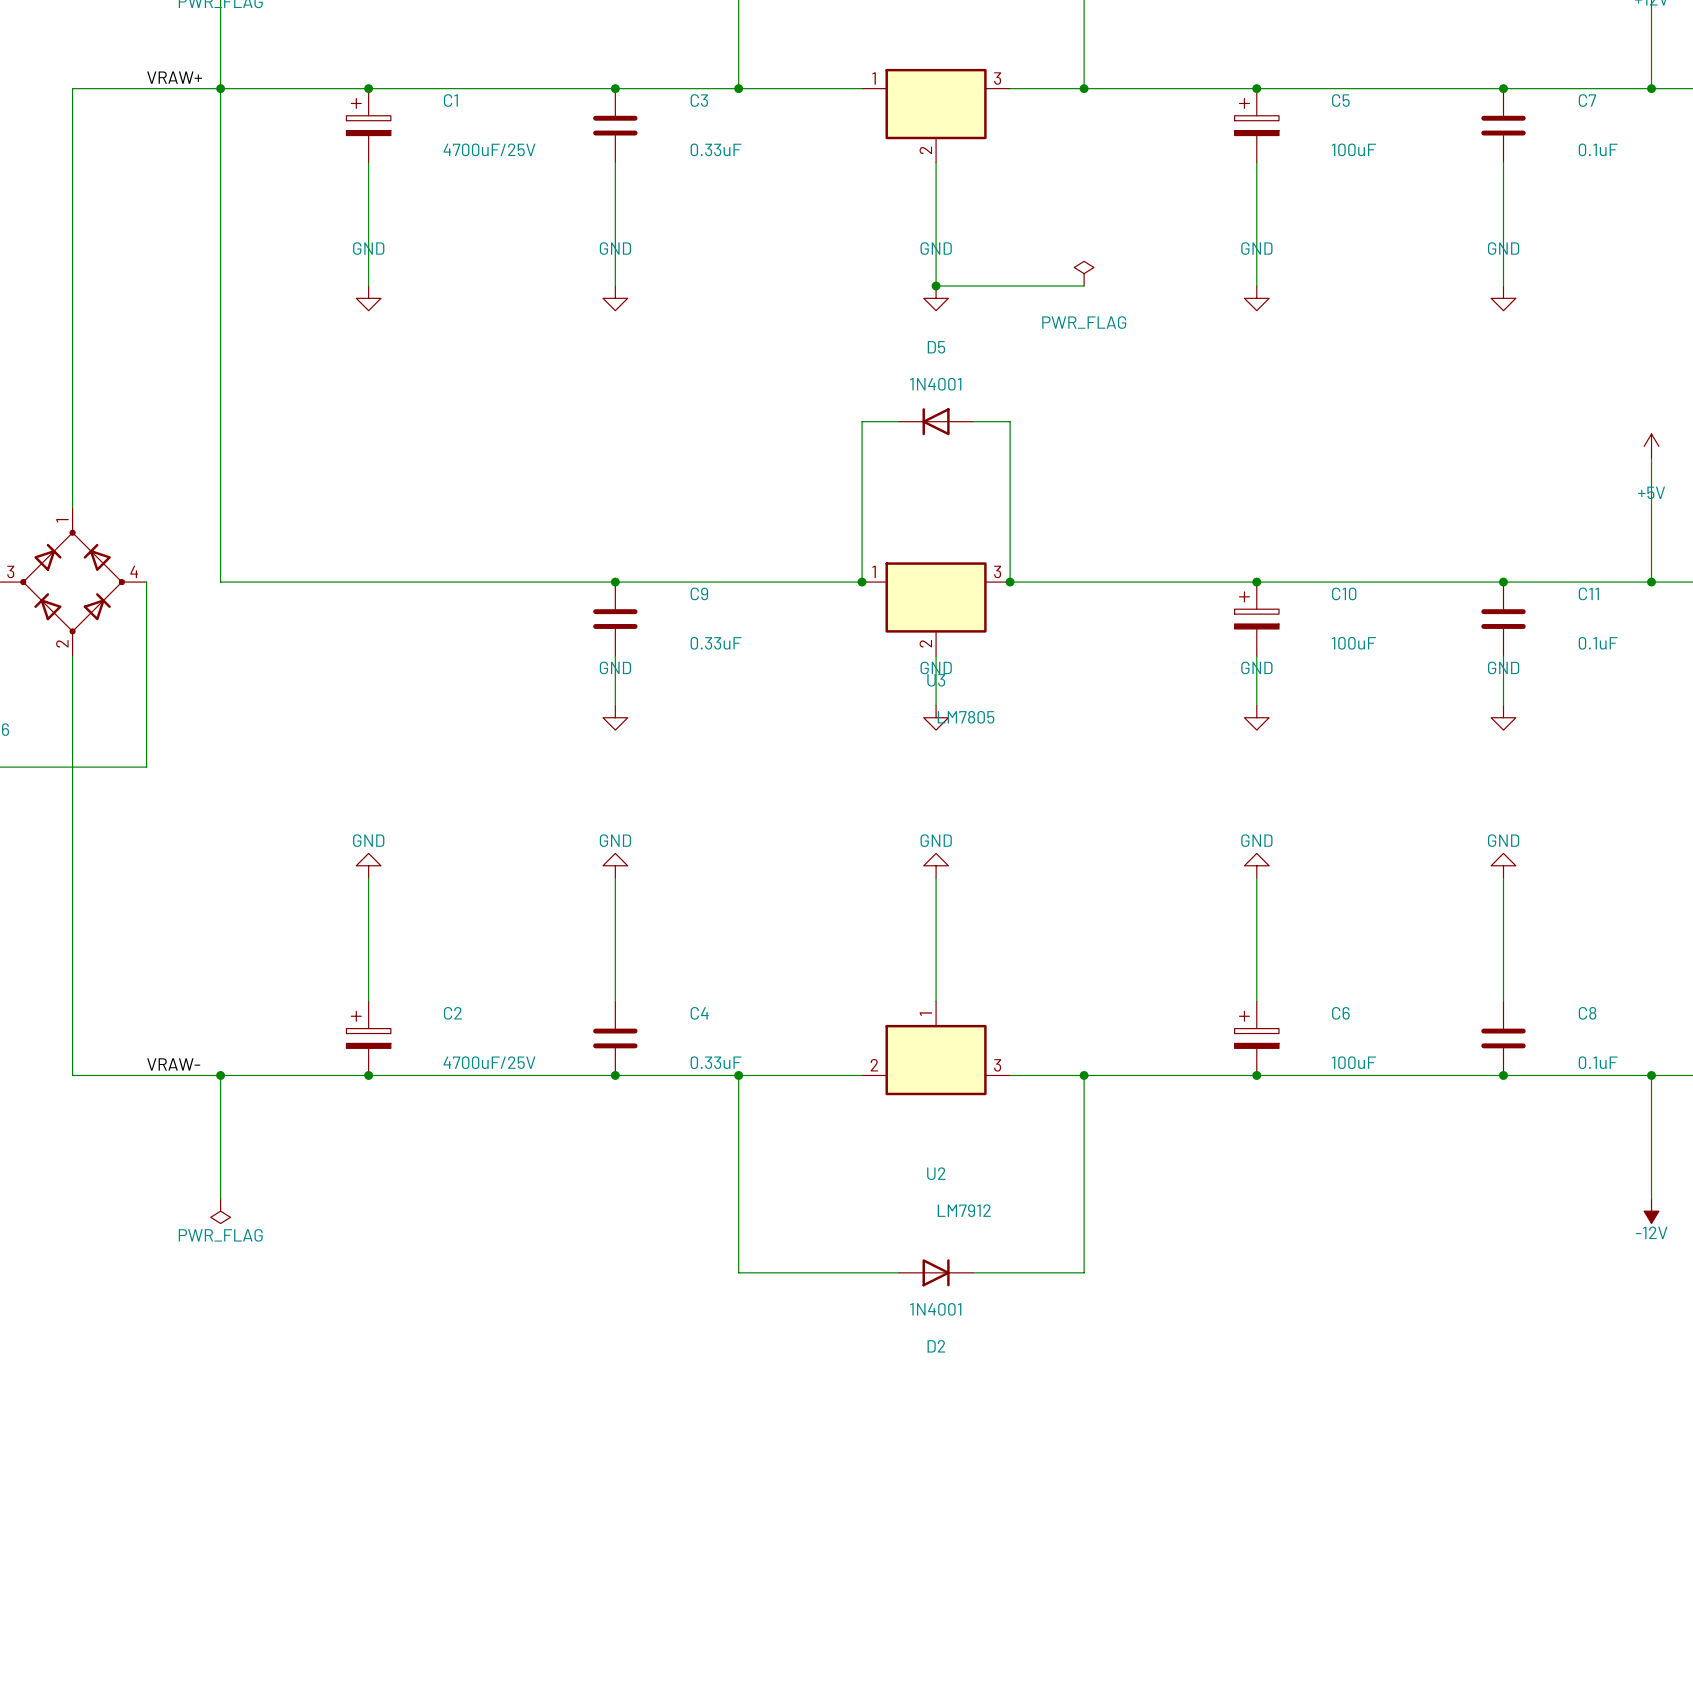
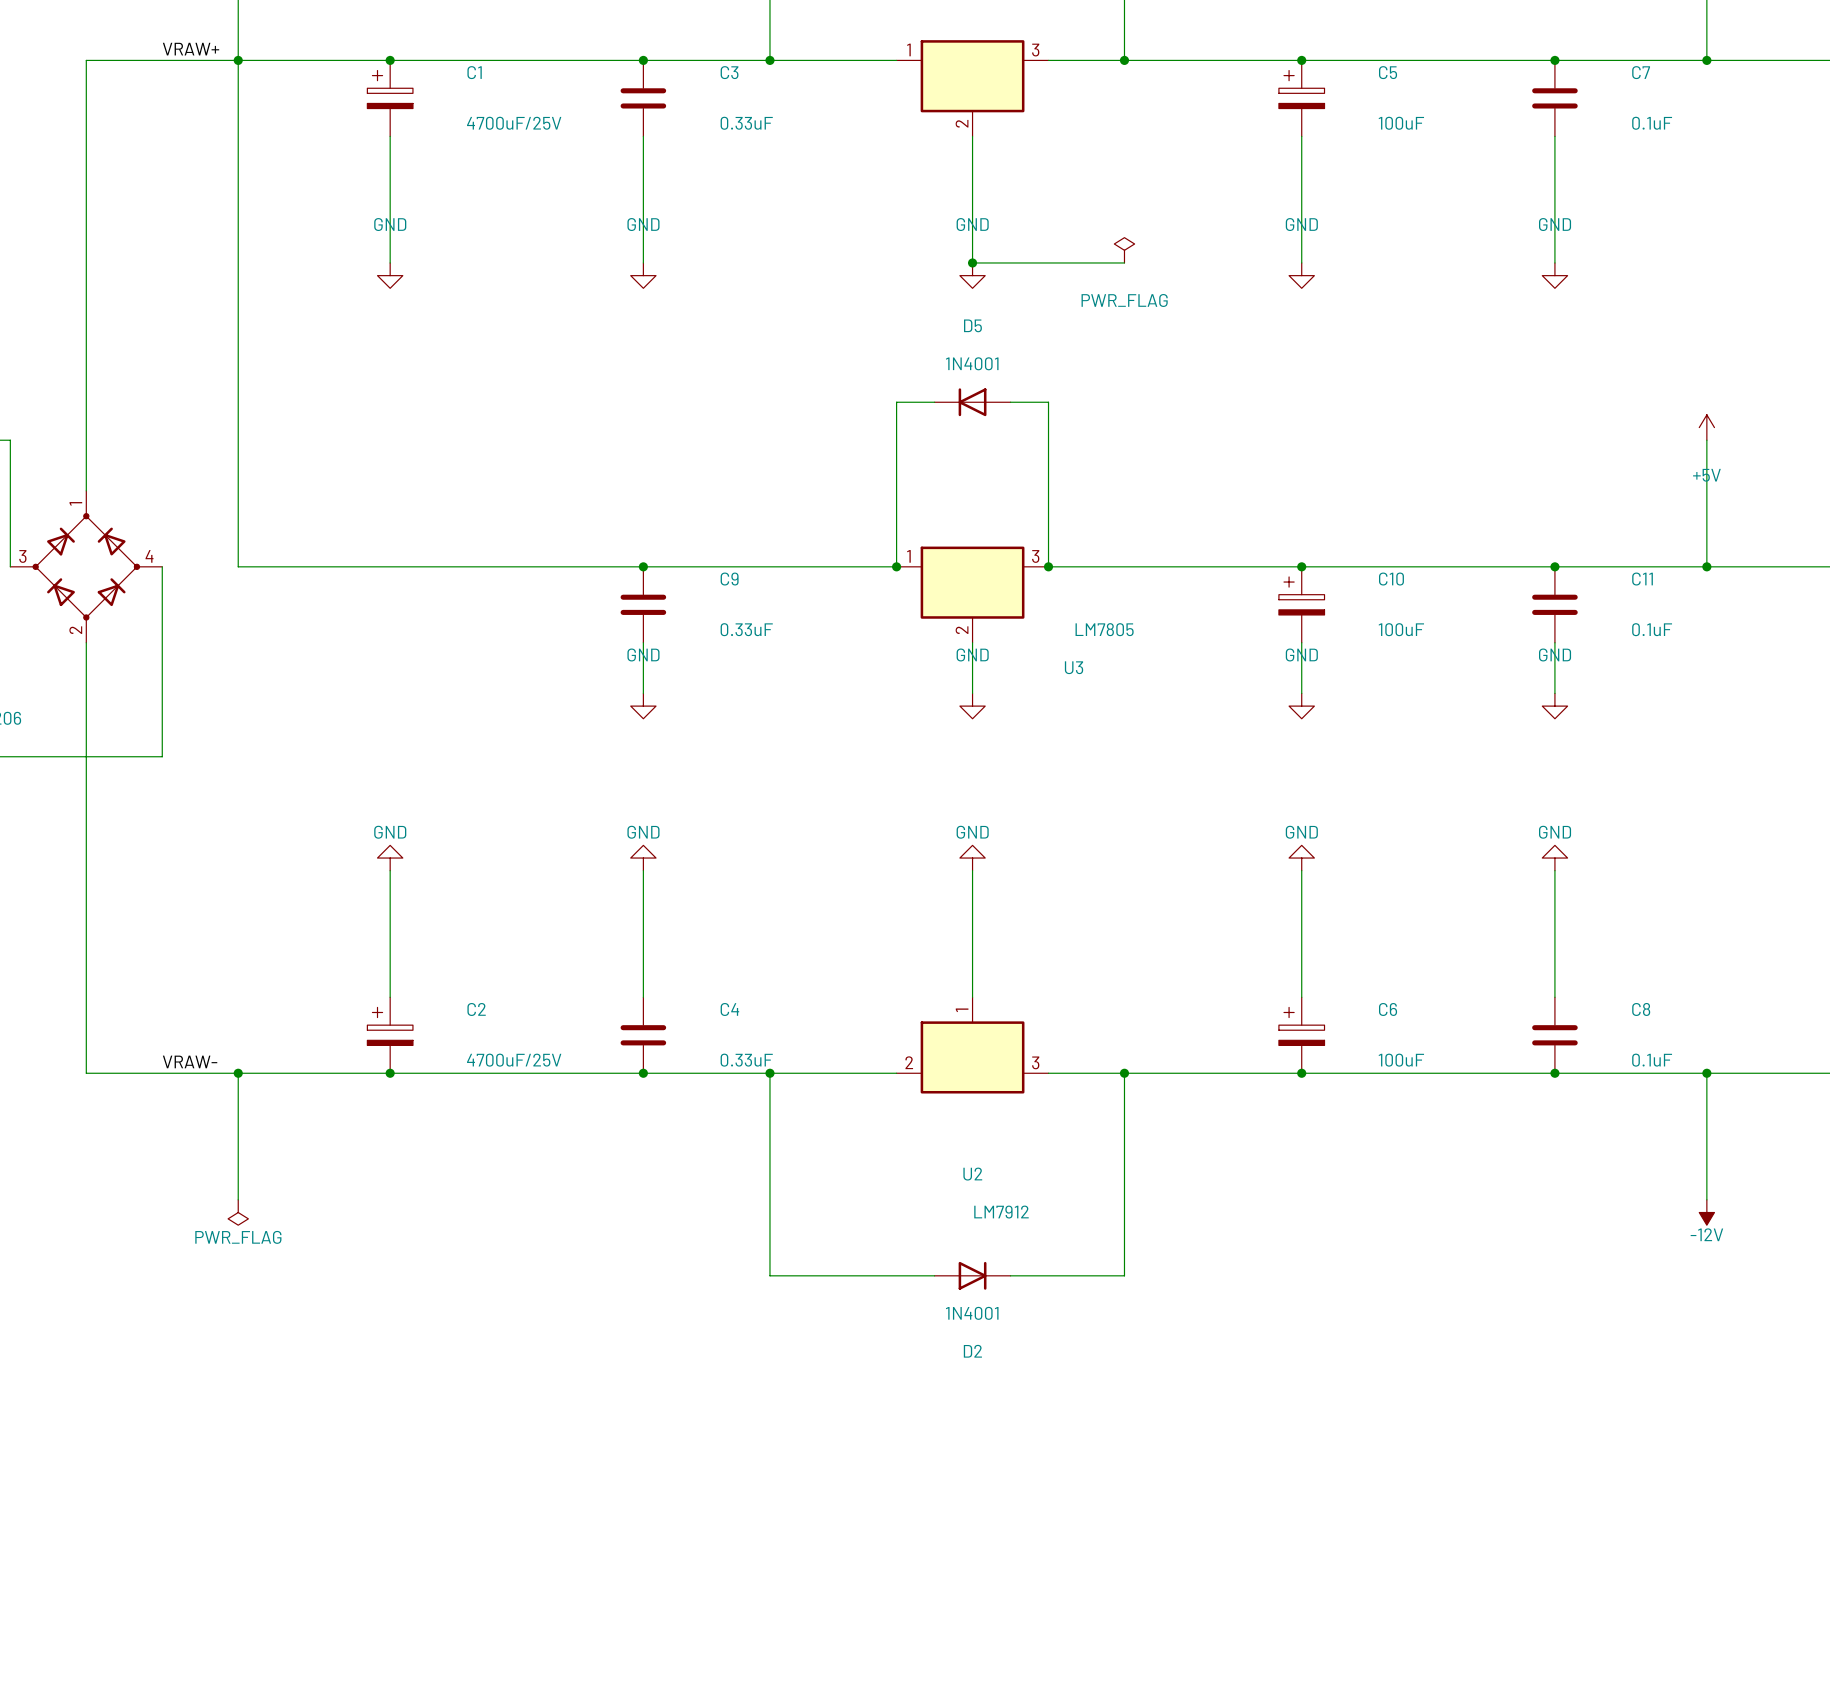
U3 name position: U3 (936, 680) -> U3 (1074, 667)
U3 value position: LM7805 (966, 717) -> LM7805 (1104, 629)

